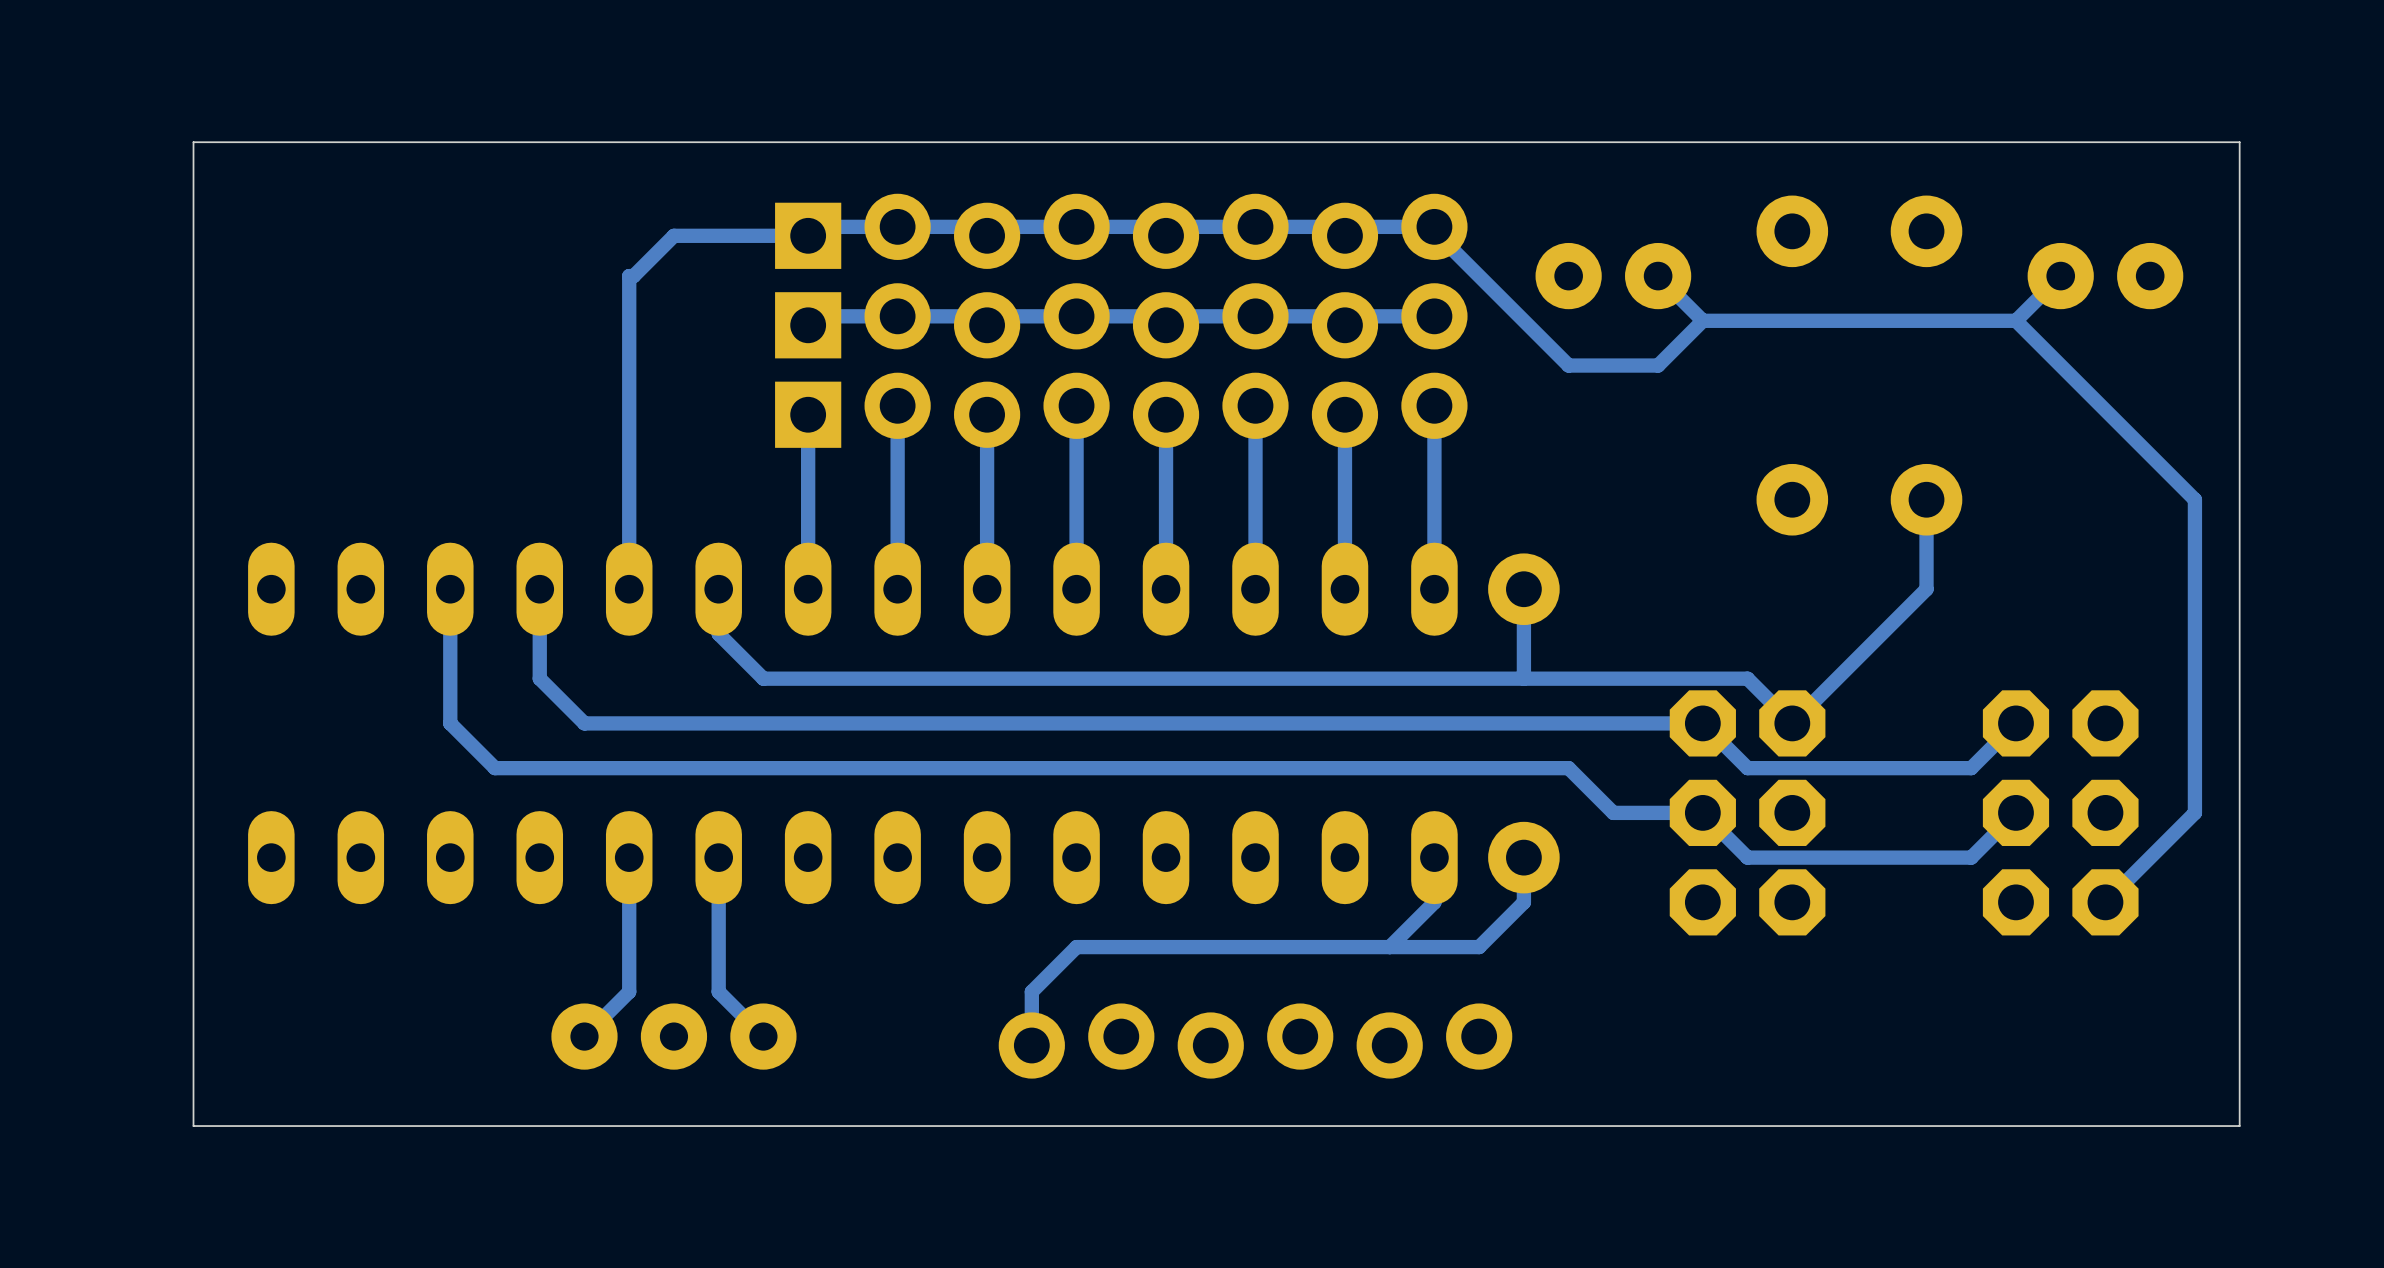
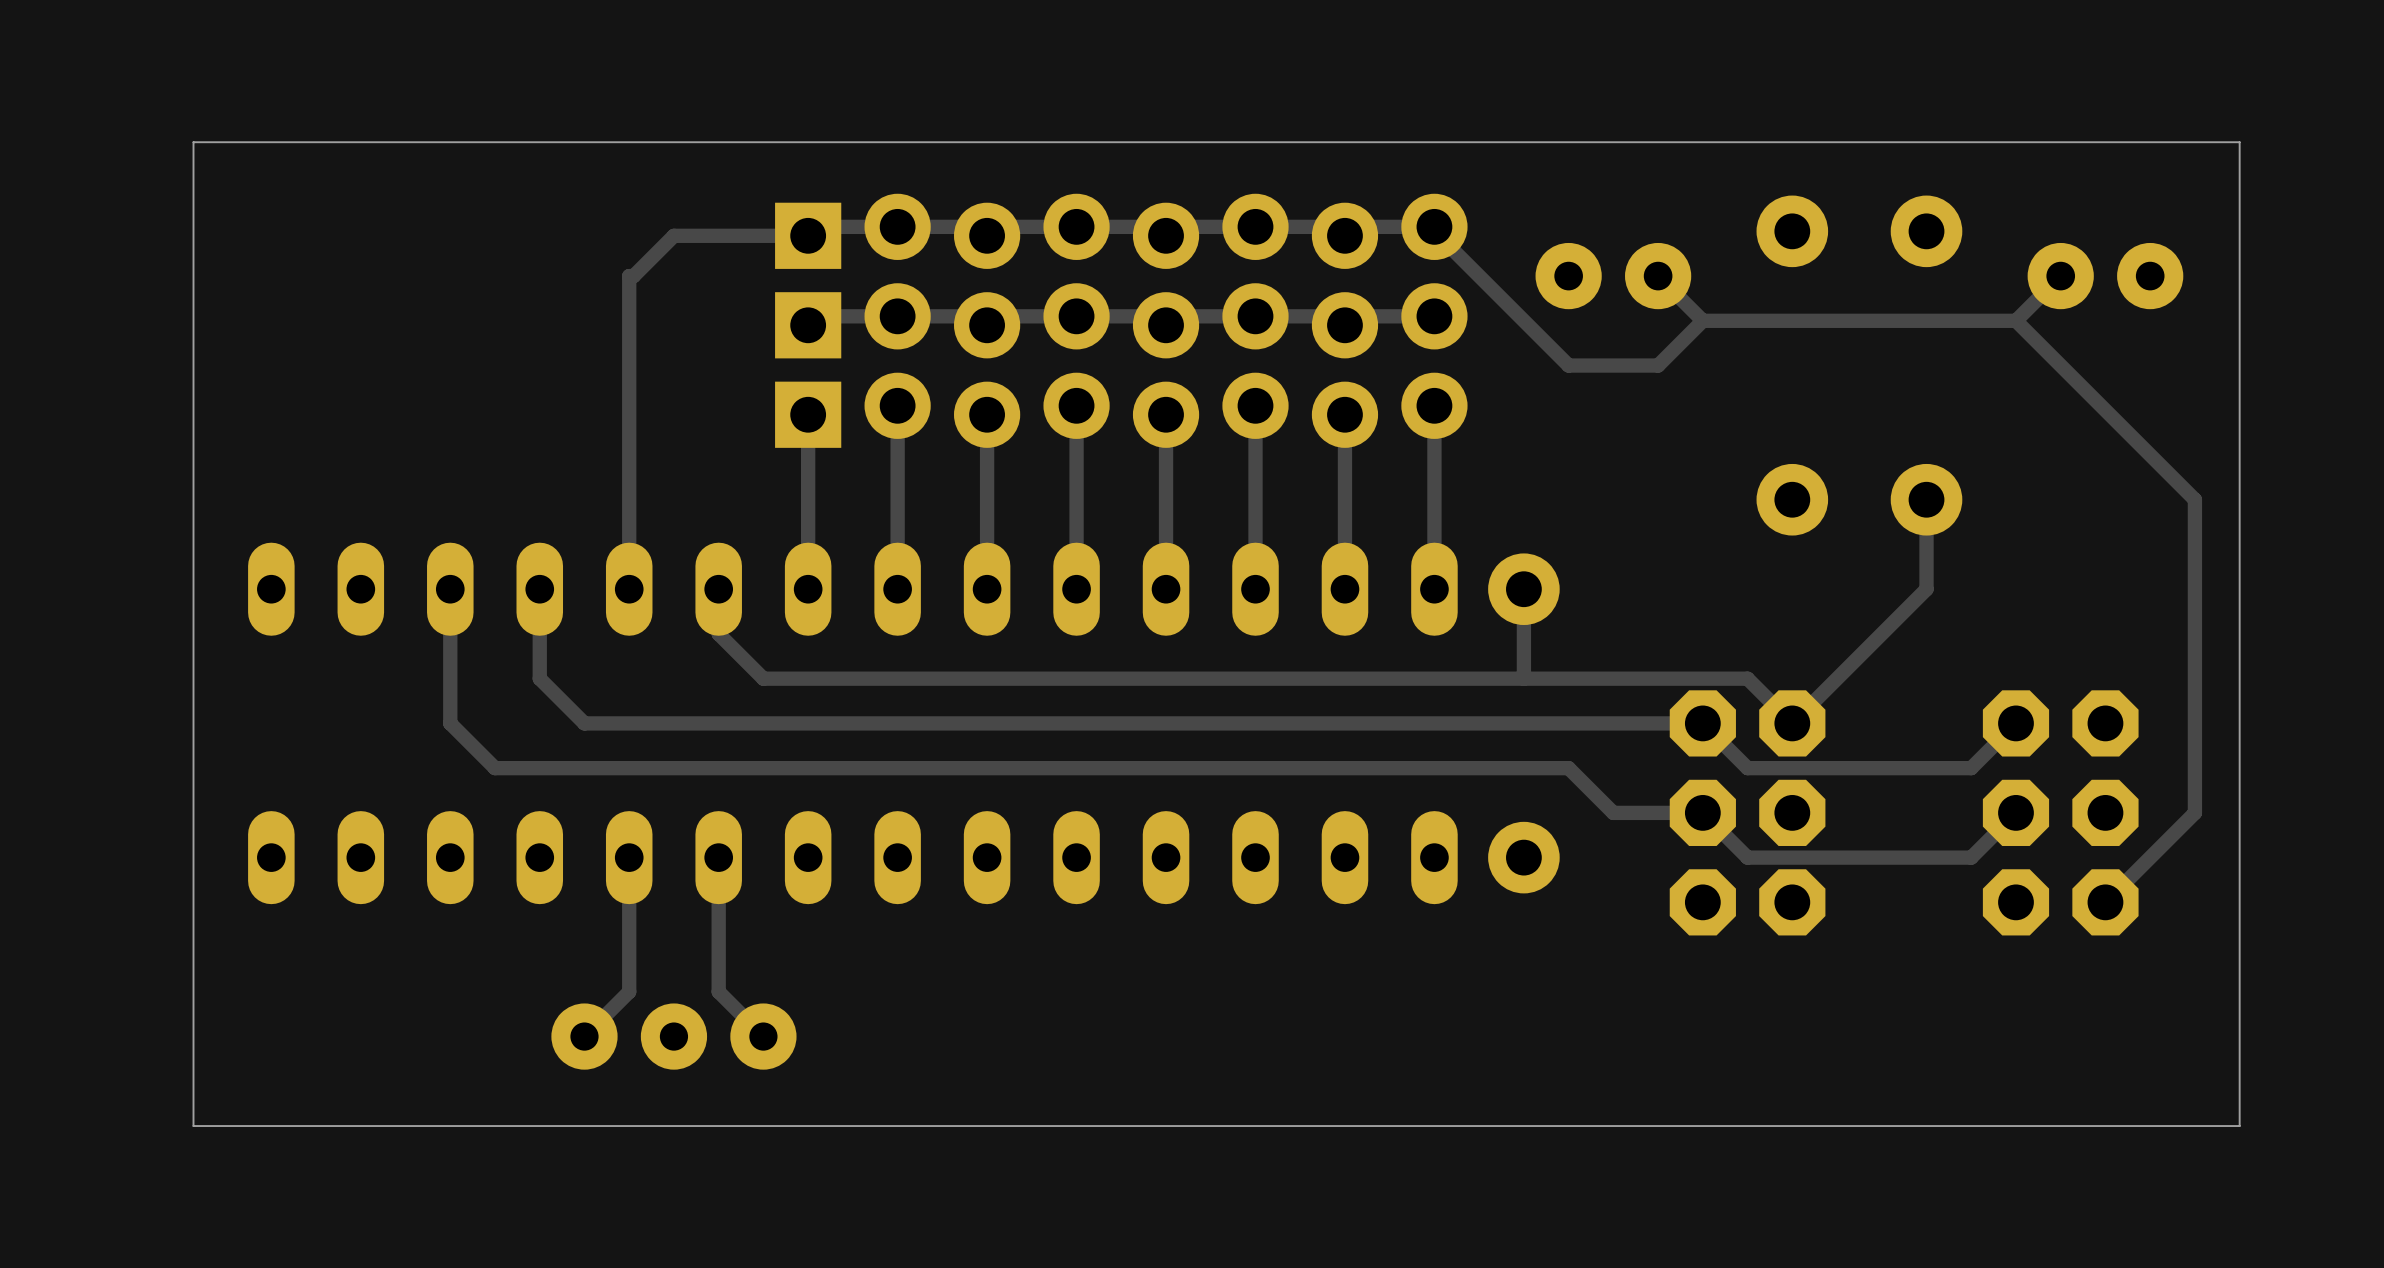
track: (1434, 857) (1434, 902) (1389, 947) -> none
track: (1523, 857) (1523, 902) (1479, 947) (1076, 947) (1031, 991) (1031, 1045) -> none
part: (1255, 1041) -> none

